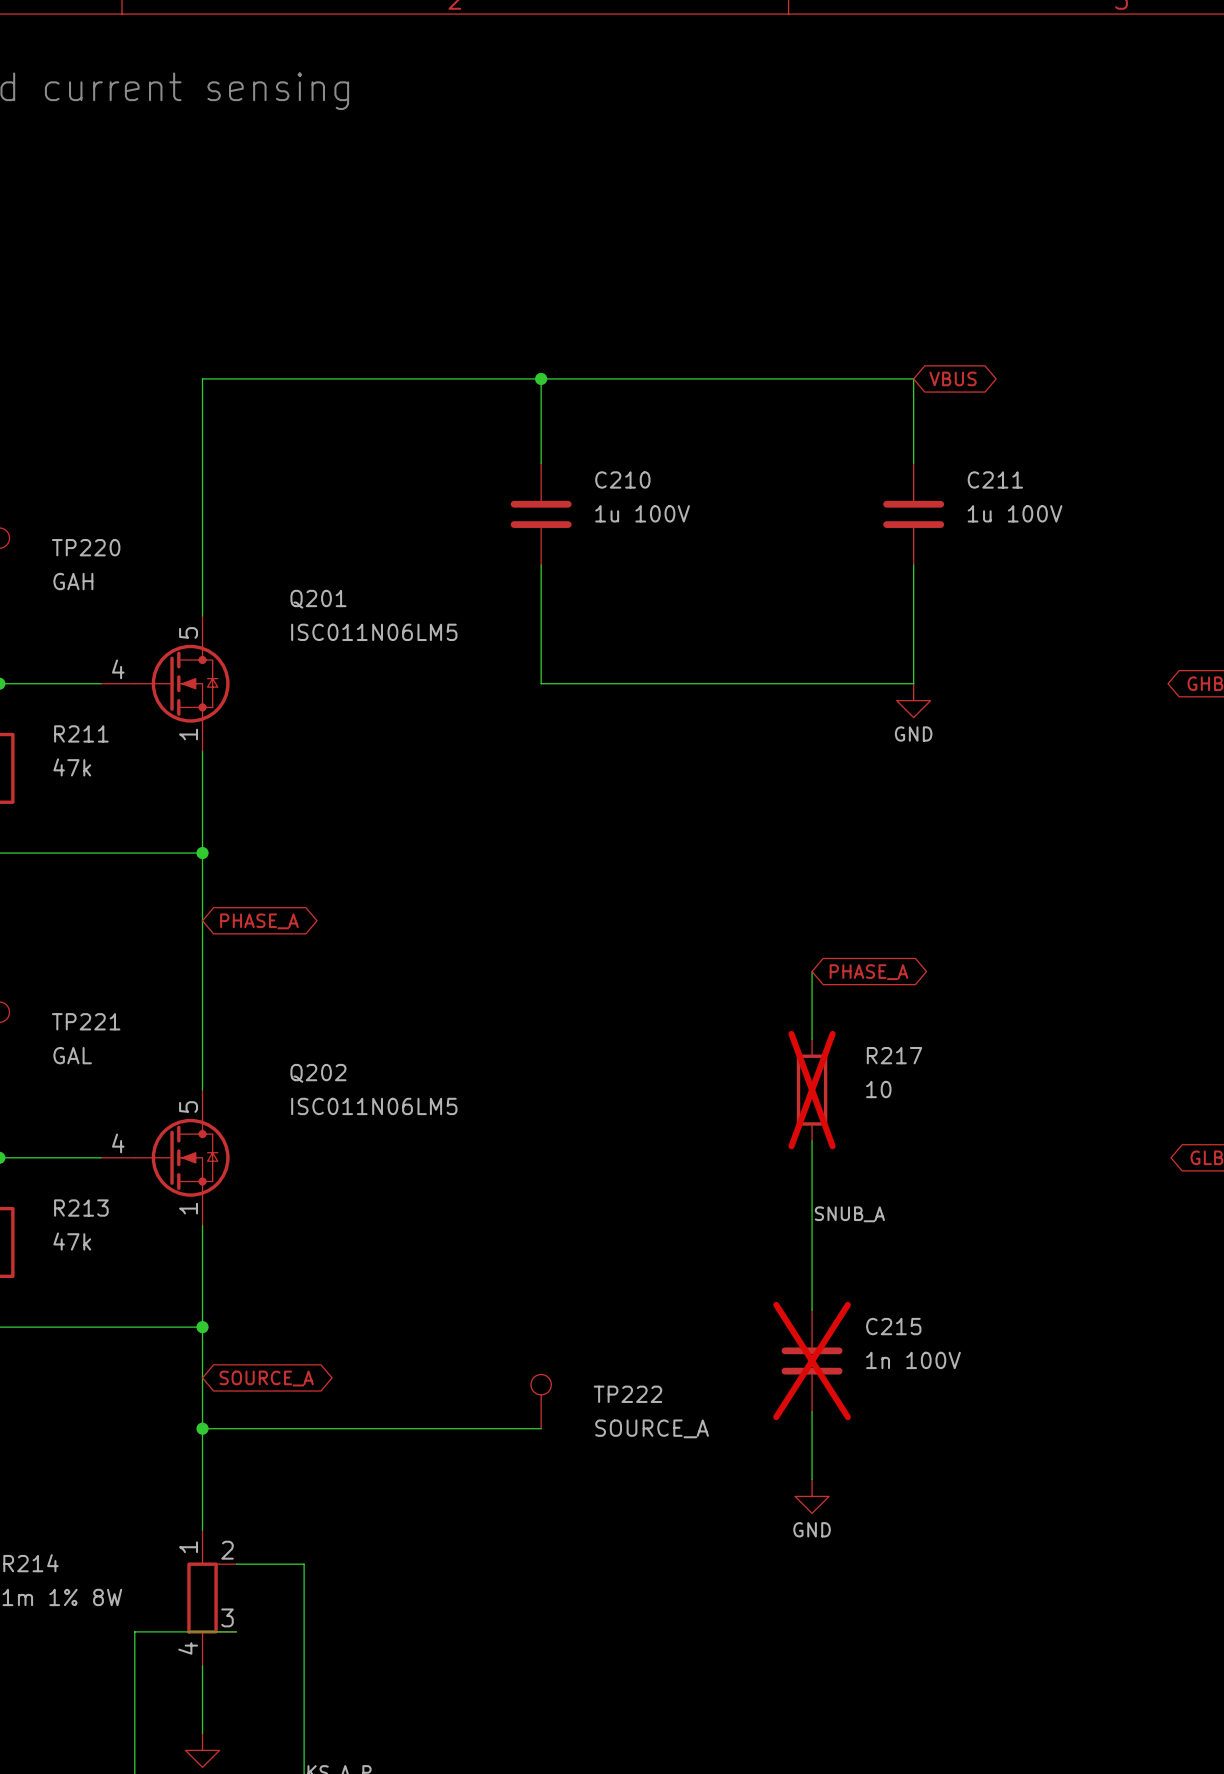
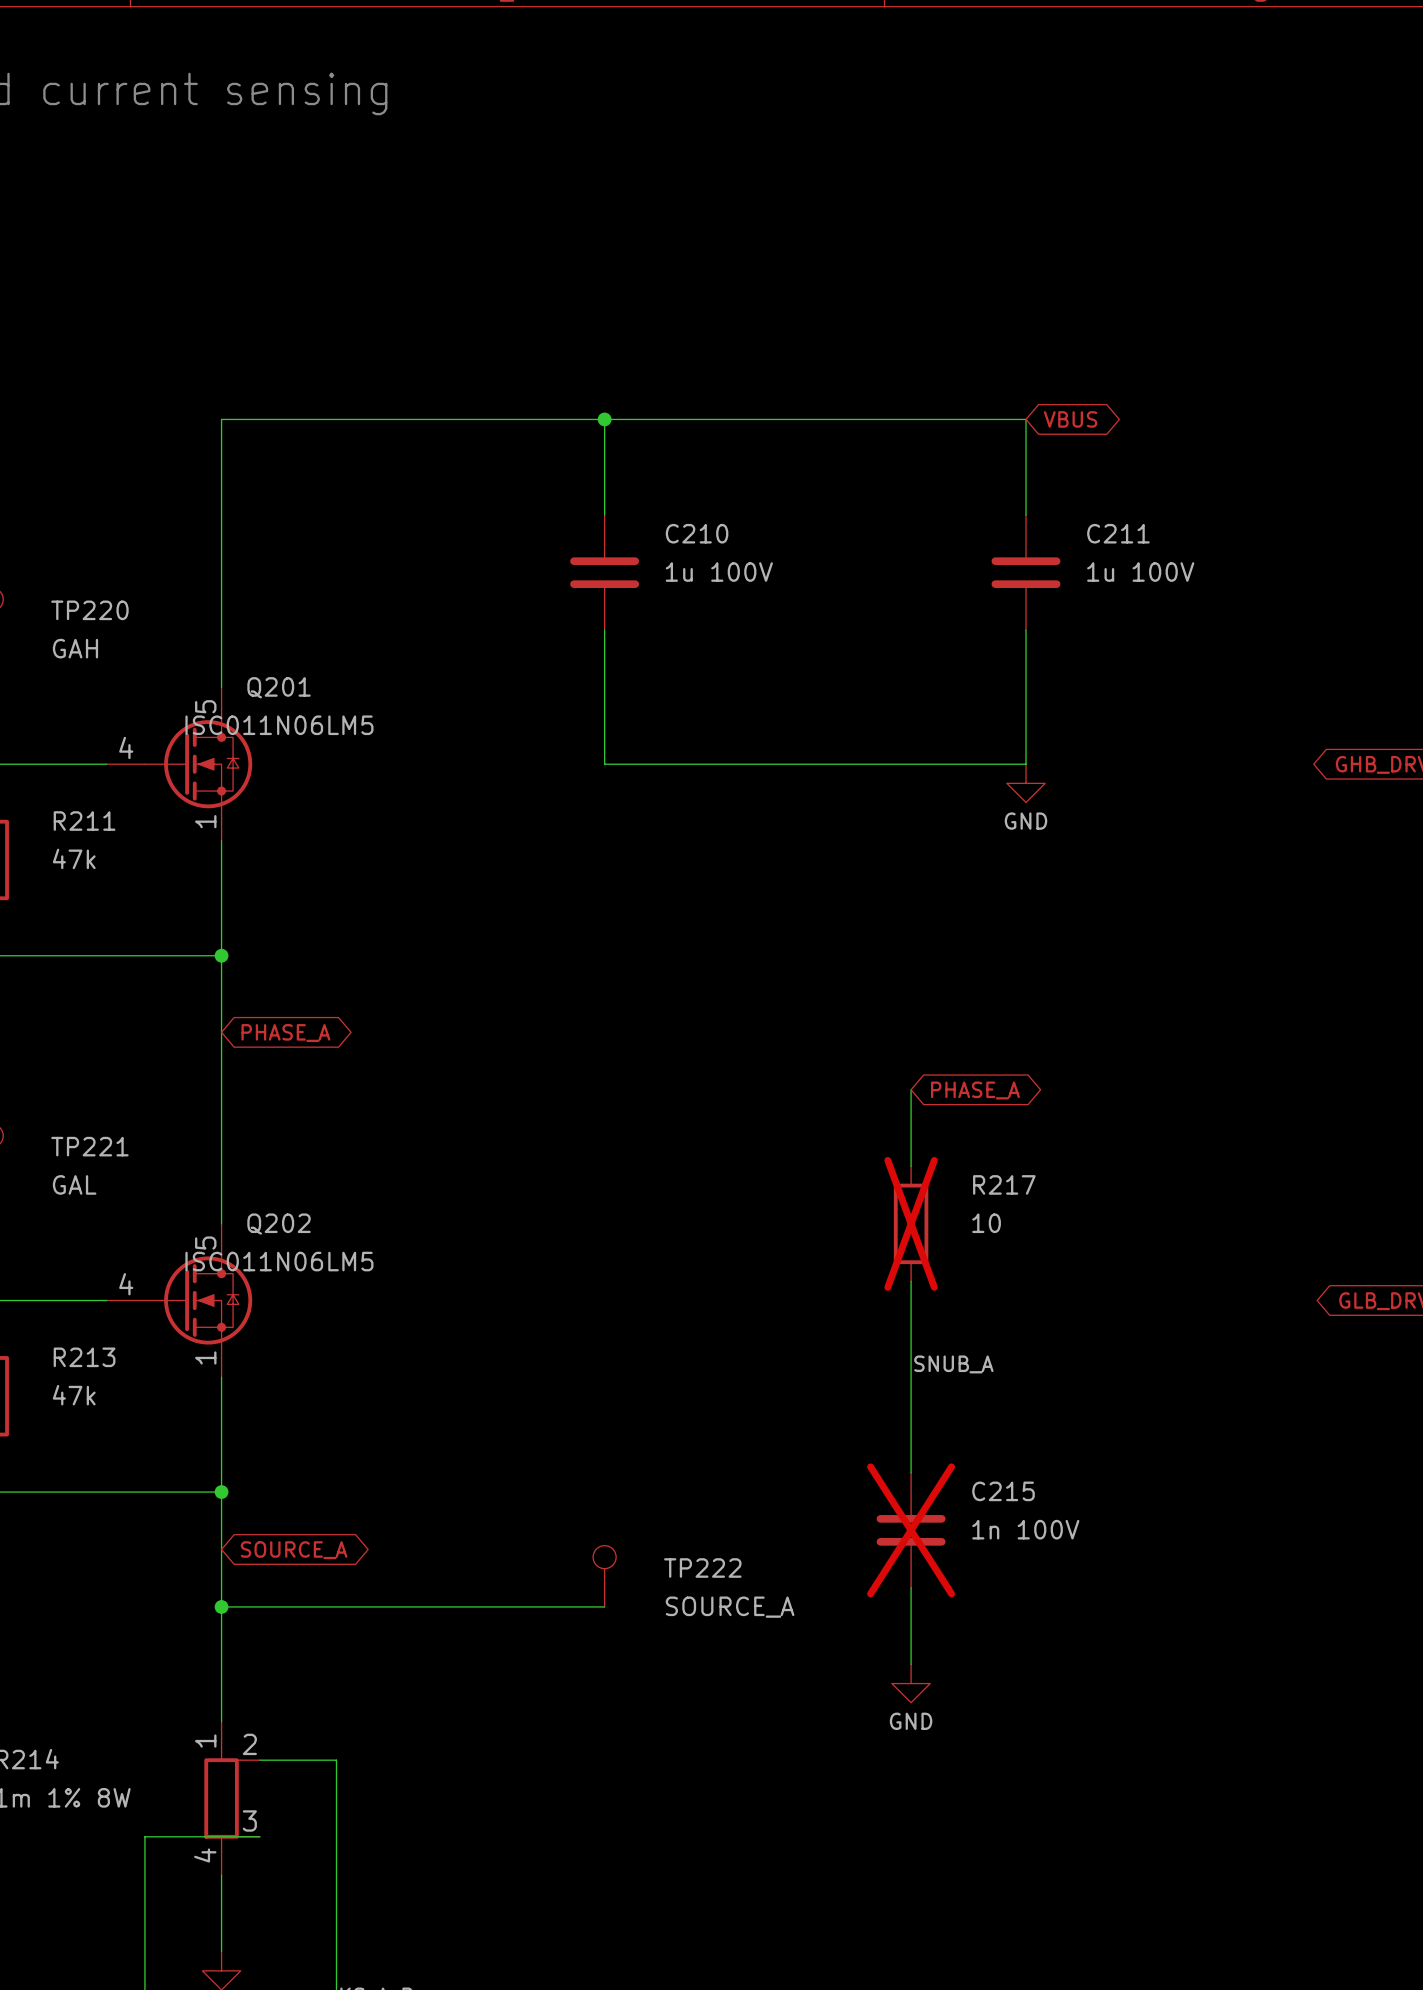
Q201 name position: Q201 (318, 599) -> Q201 (279, 687)
Q201 value position: ISC011N06LM5 (374, 632) -> ISC011N06LM5 (279, 725)
Q202 name position: Q202 (318, 1073) -> Q202 (279, 1224)
Q202 value position: ISC011N06LM5 (374, 1106) -> ISC011N06LM5 (279, 1261)

